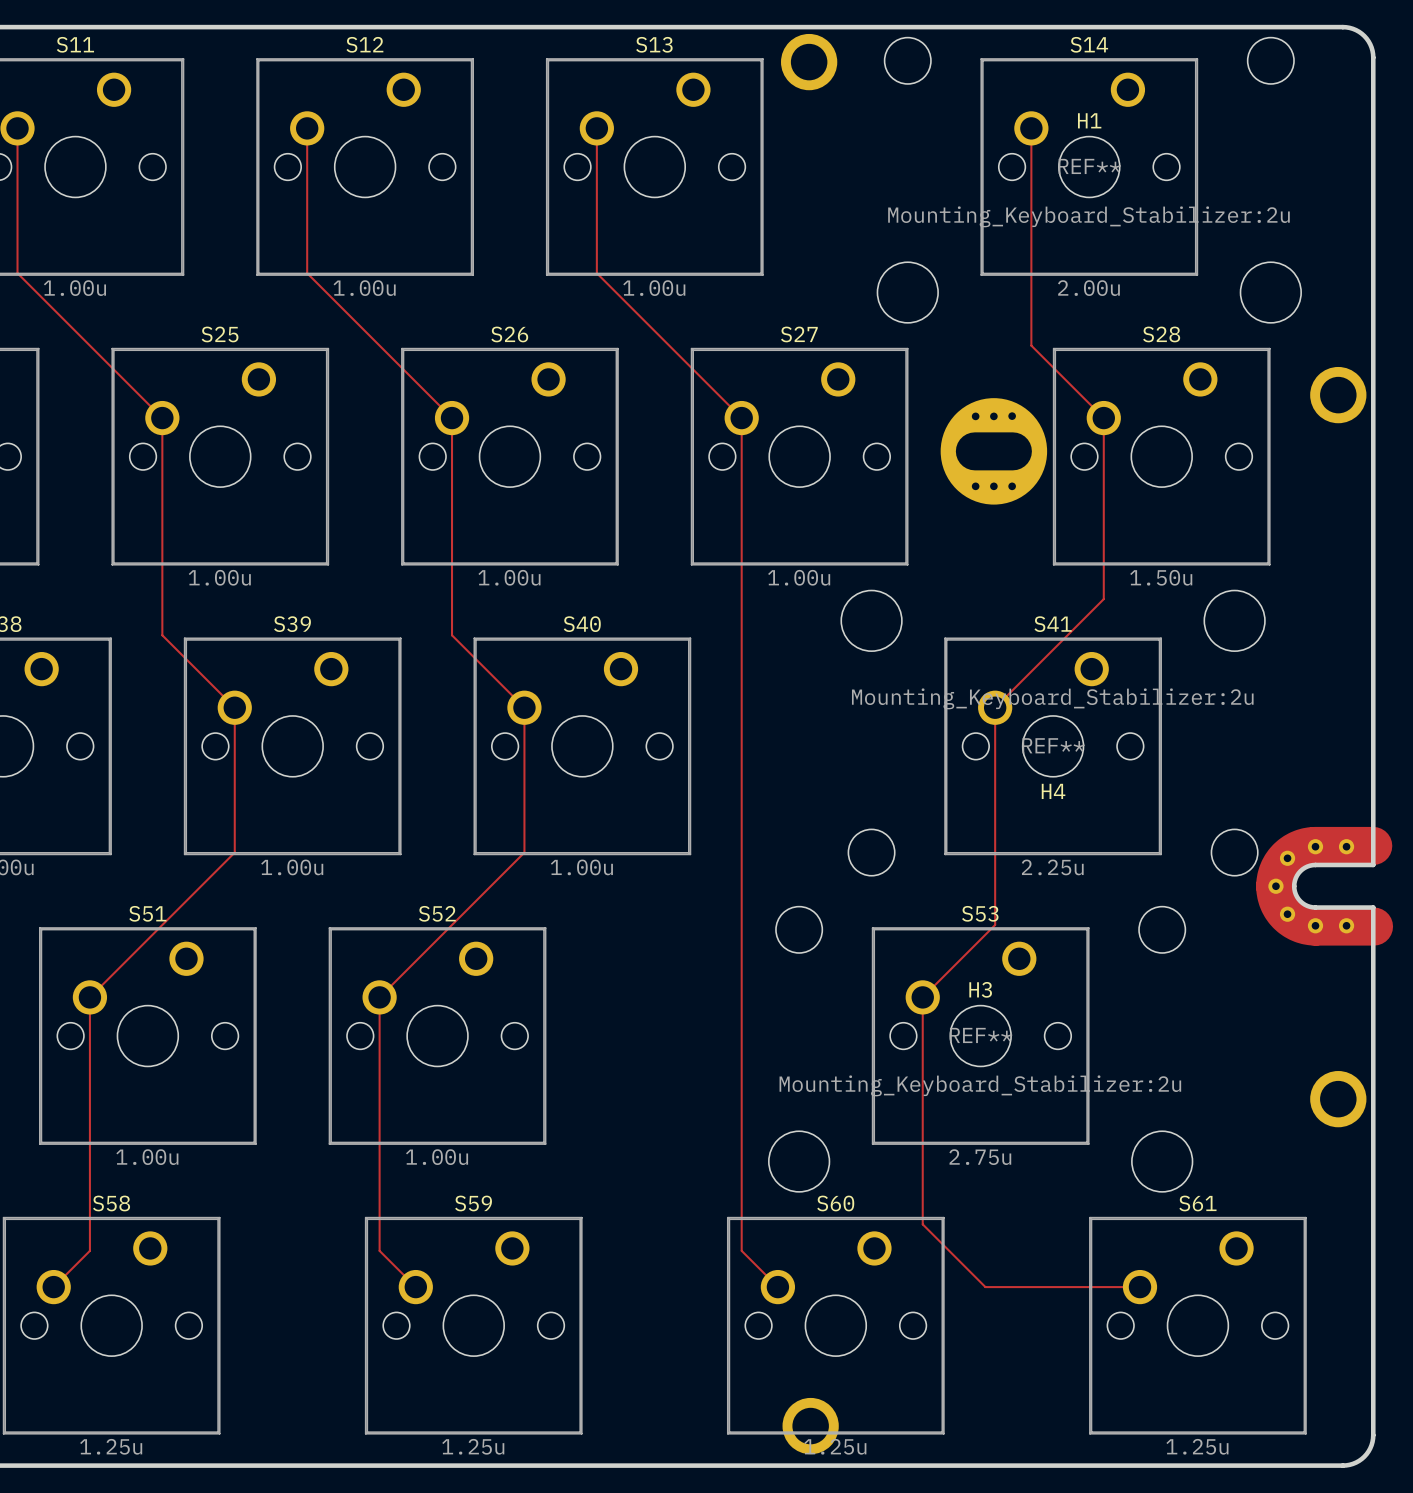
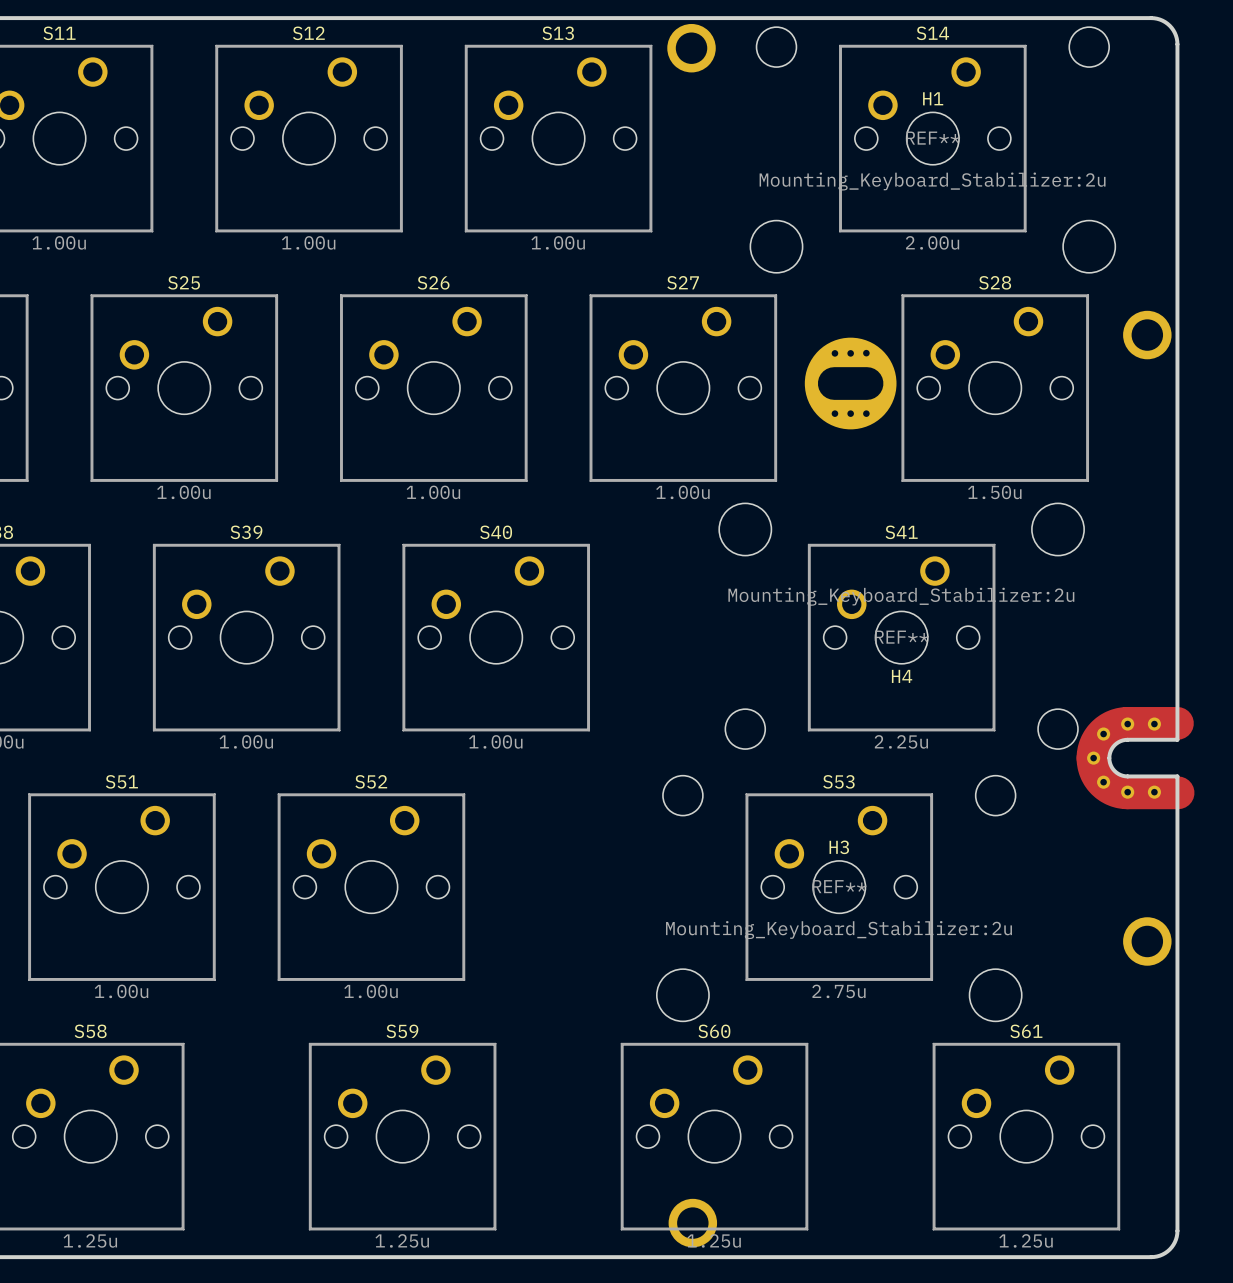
track: (17, 128) (17, 273) (162, 418) (162, 635) (234, 707) (234, 852) (89, 997) (89, 1250) (53, 1287) -> none
track: (307, 128) (307, 273) (452, 418) (452, 635) (524, 707) (524, 852) (379, 997) (379, 1250) (415, 1287) -> none
track: (596, 128) (596, 273) (741, 418) (741, 1250) (777, 1287) -> none
track: (1031, 128) (1031, 345) (1103, 418) (1103, 599) (995, 707) (995, 924) (922, 997) (922, 1224) (985, 1287) (1140, 1287) -> none

